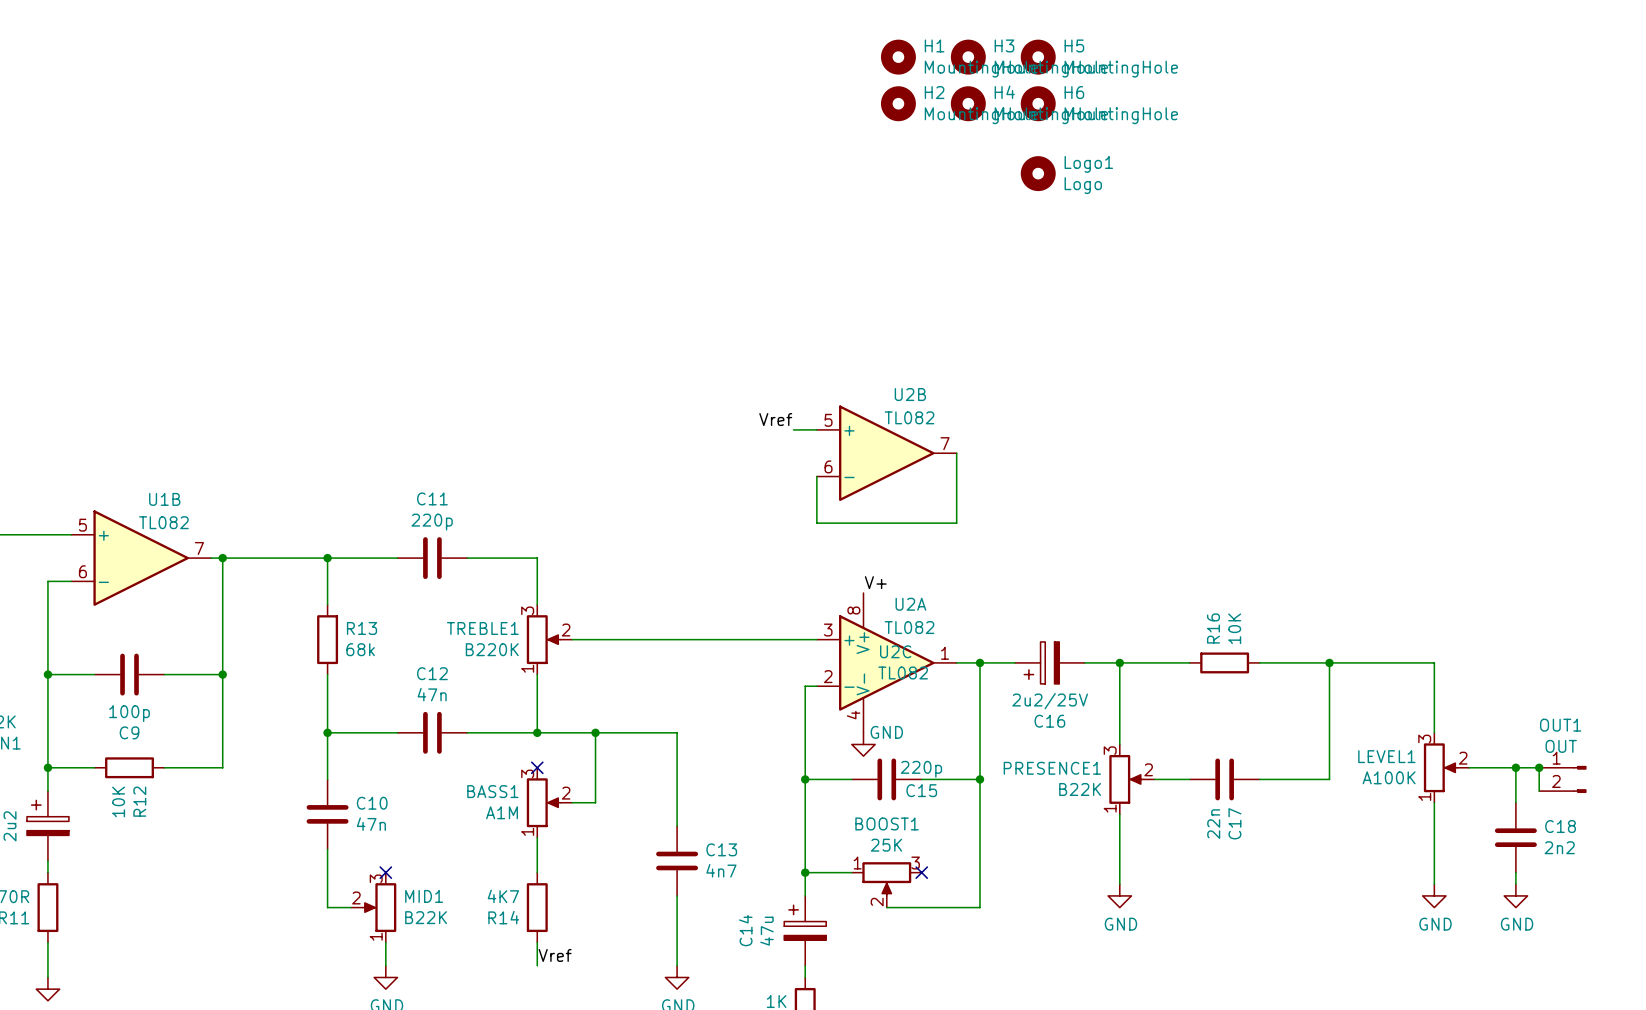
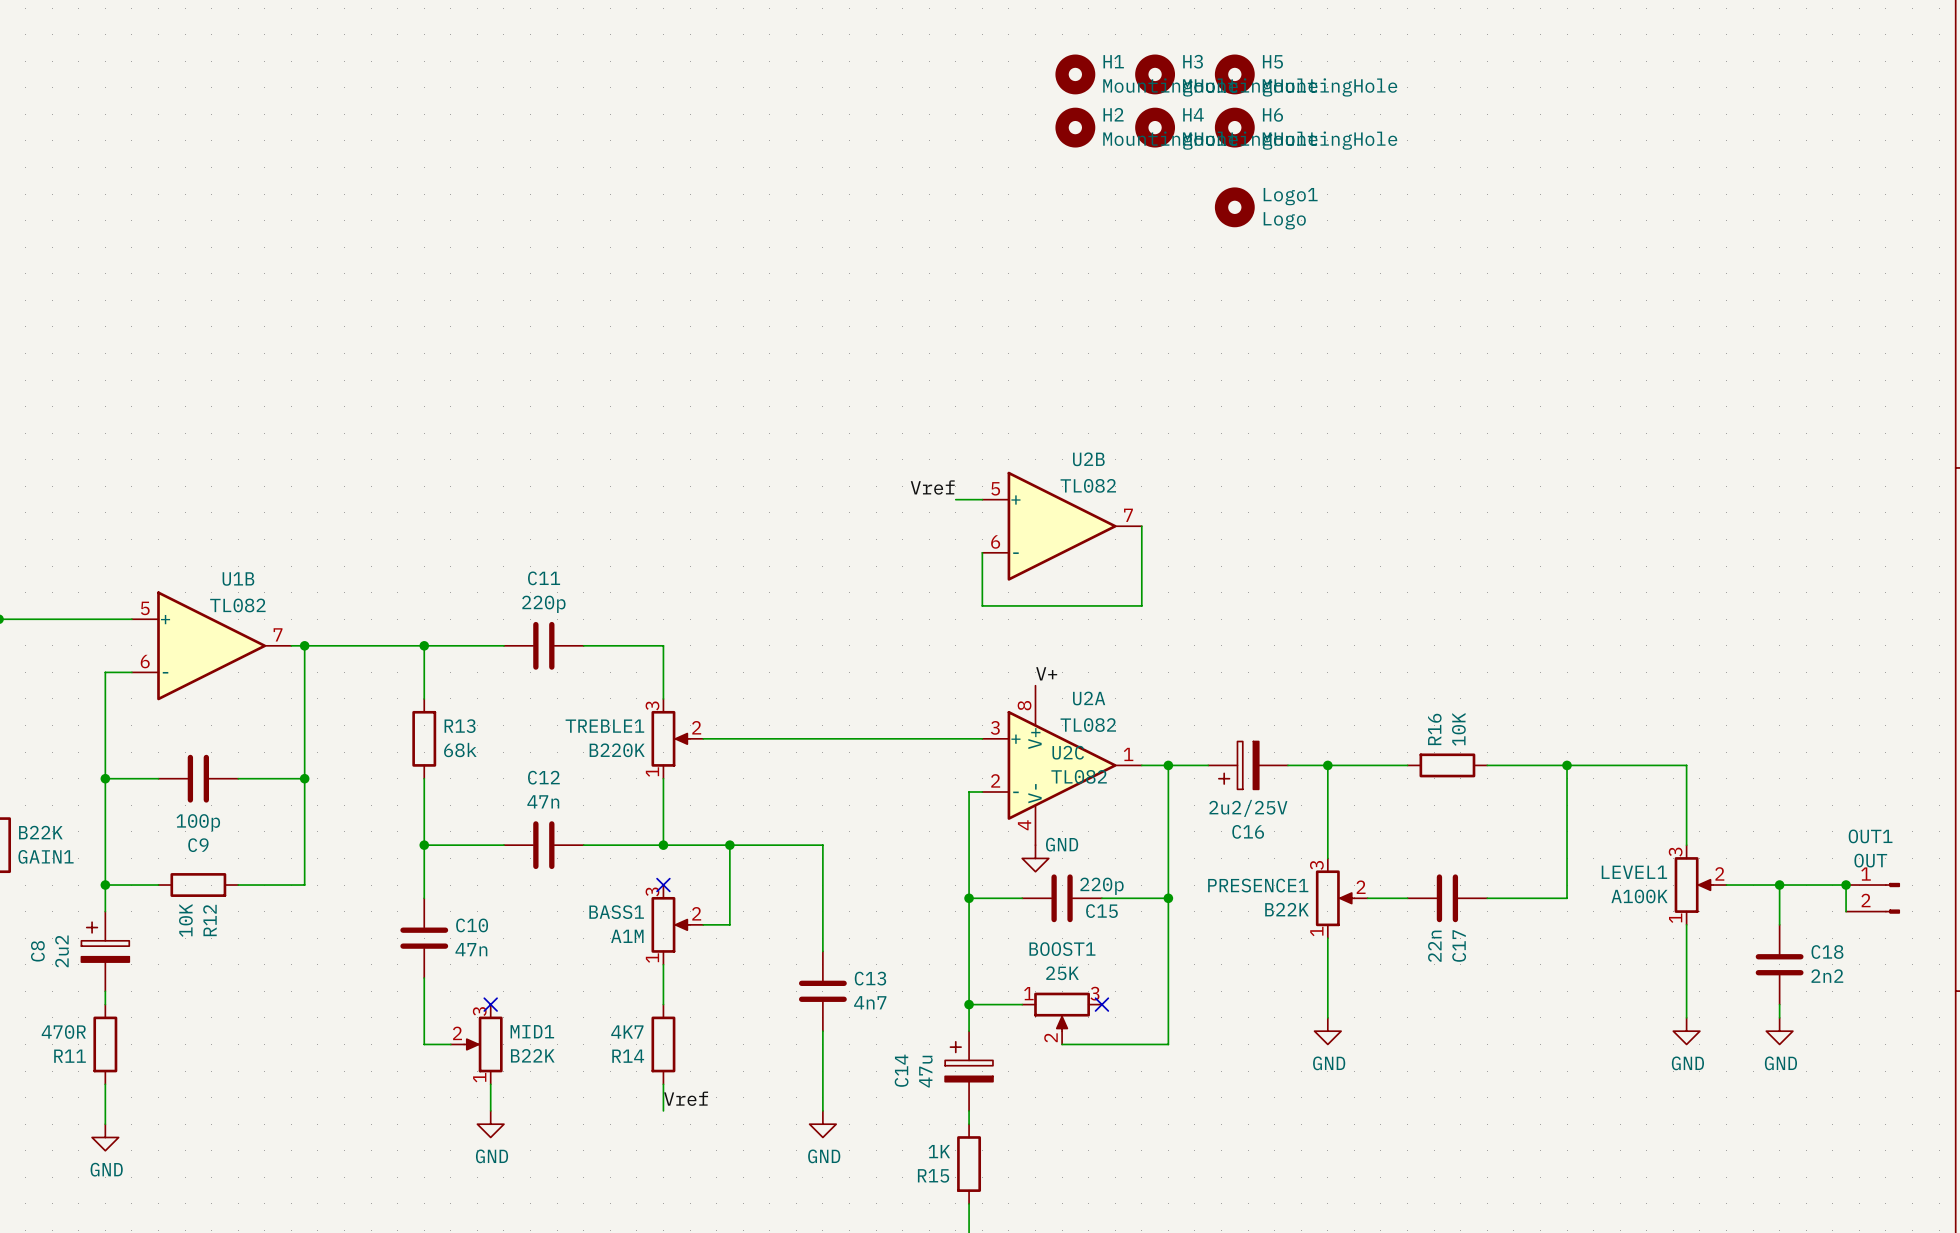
wire: (1539, 767) (1539, 791) -> (1806, 885) (1846, 885) (1846, 911)
junction position: (1539, 767) -> (1846, 885)
OUT1 position: (1562, 779) -> (1873, 898)

